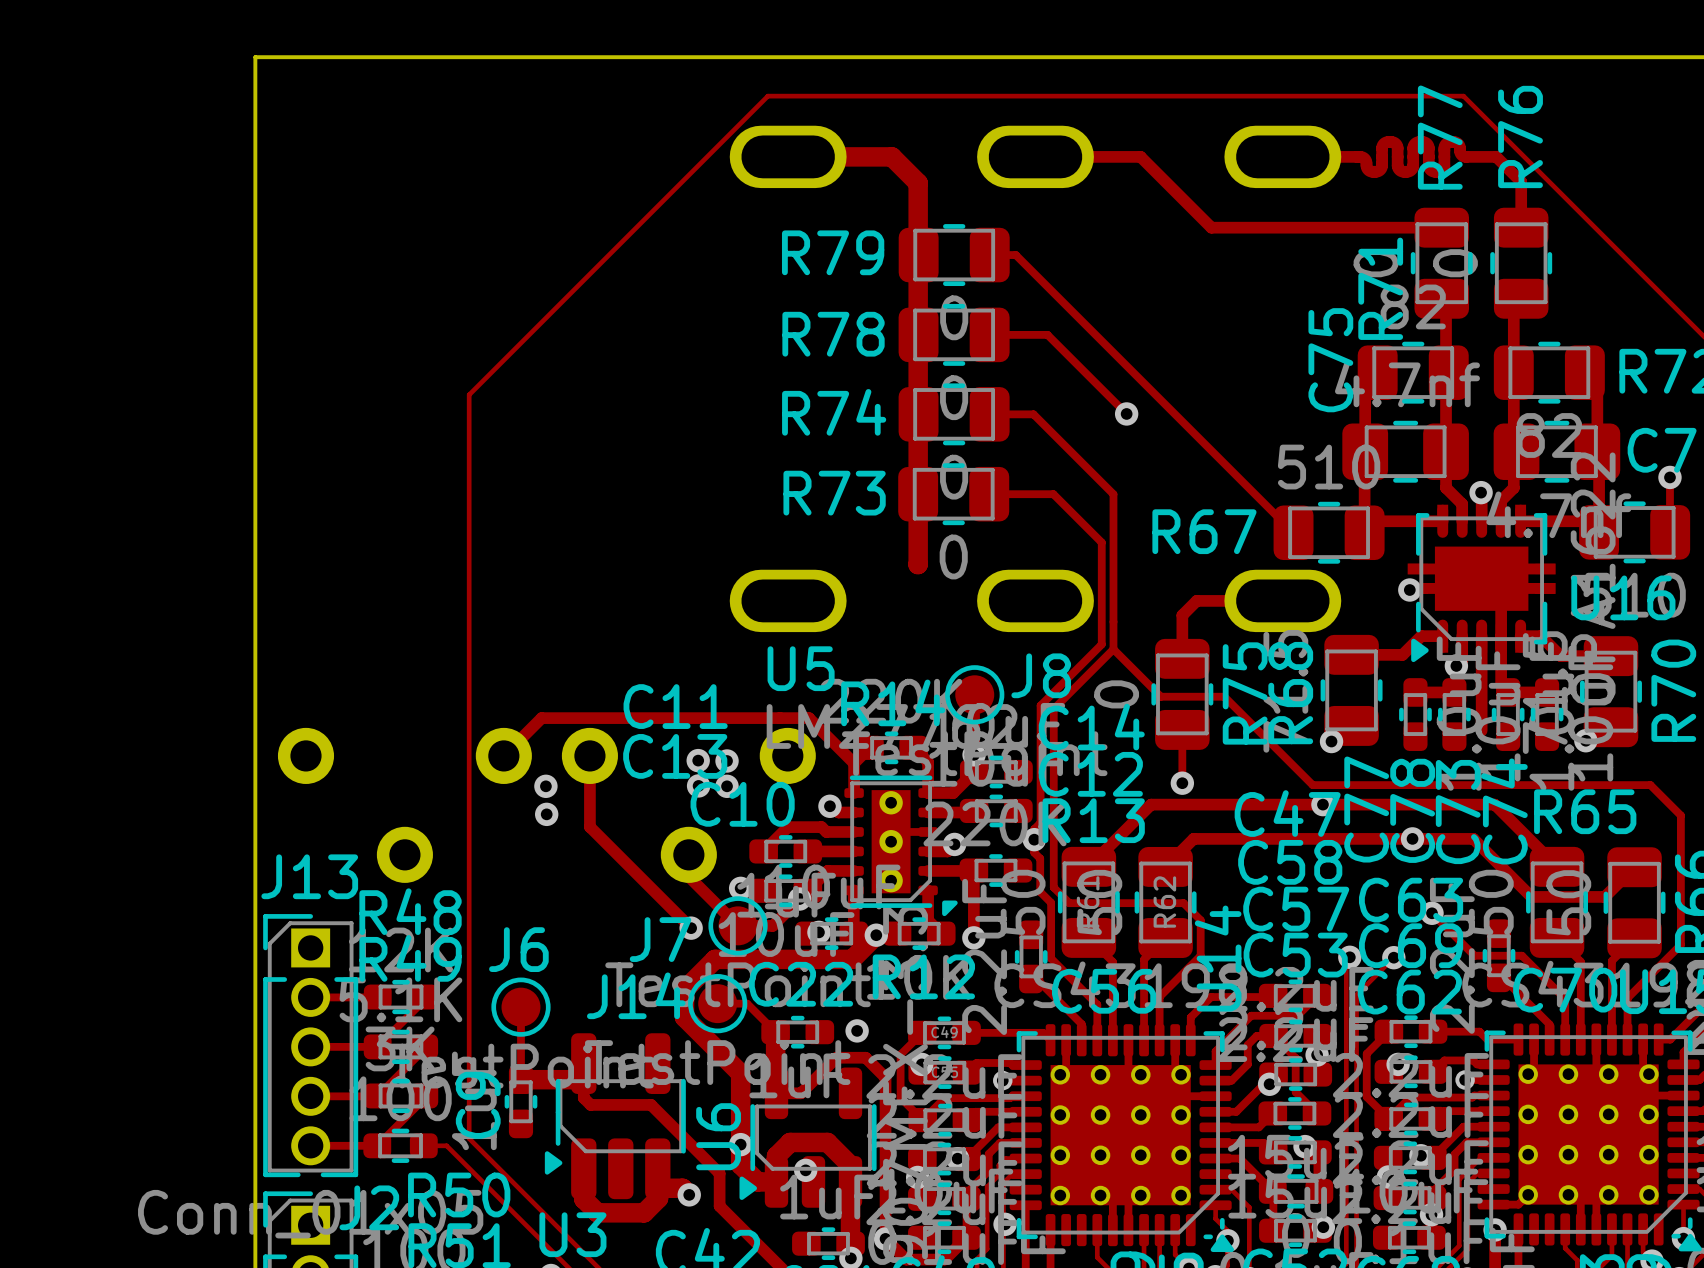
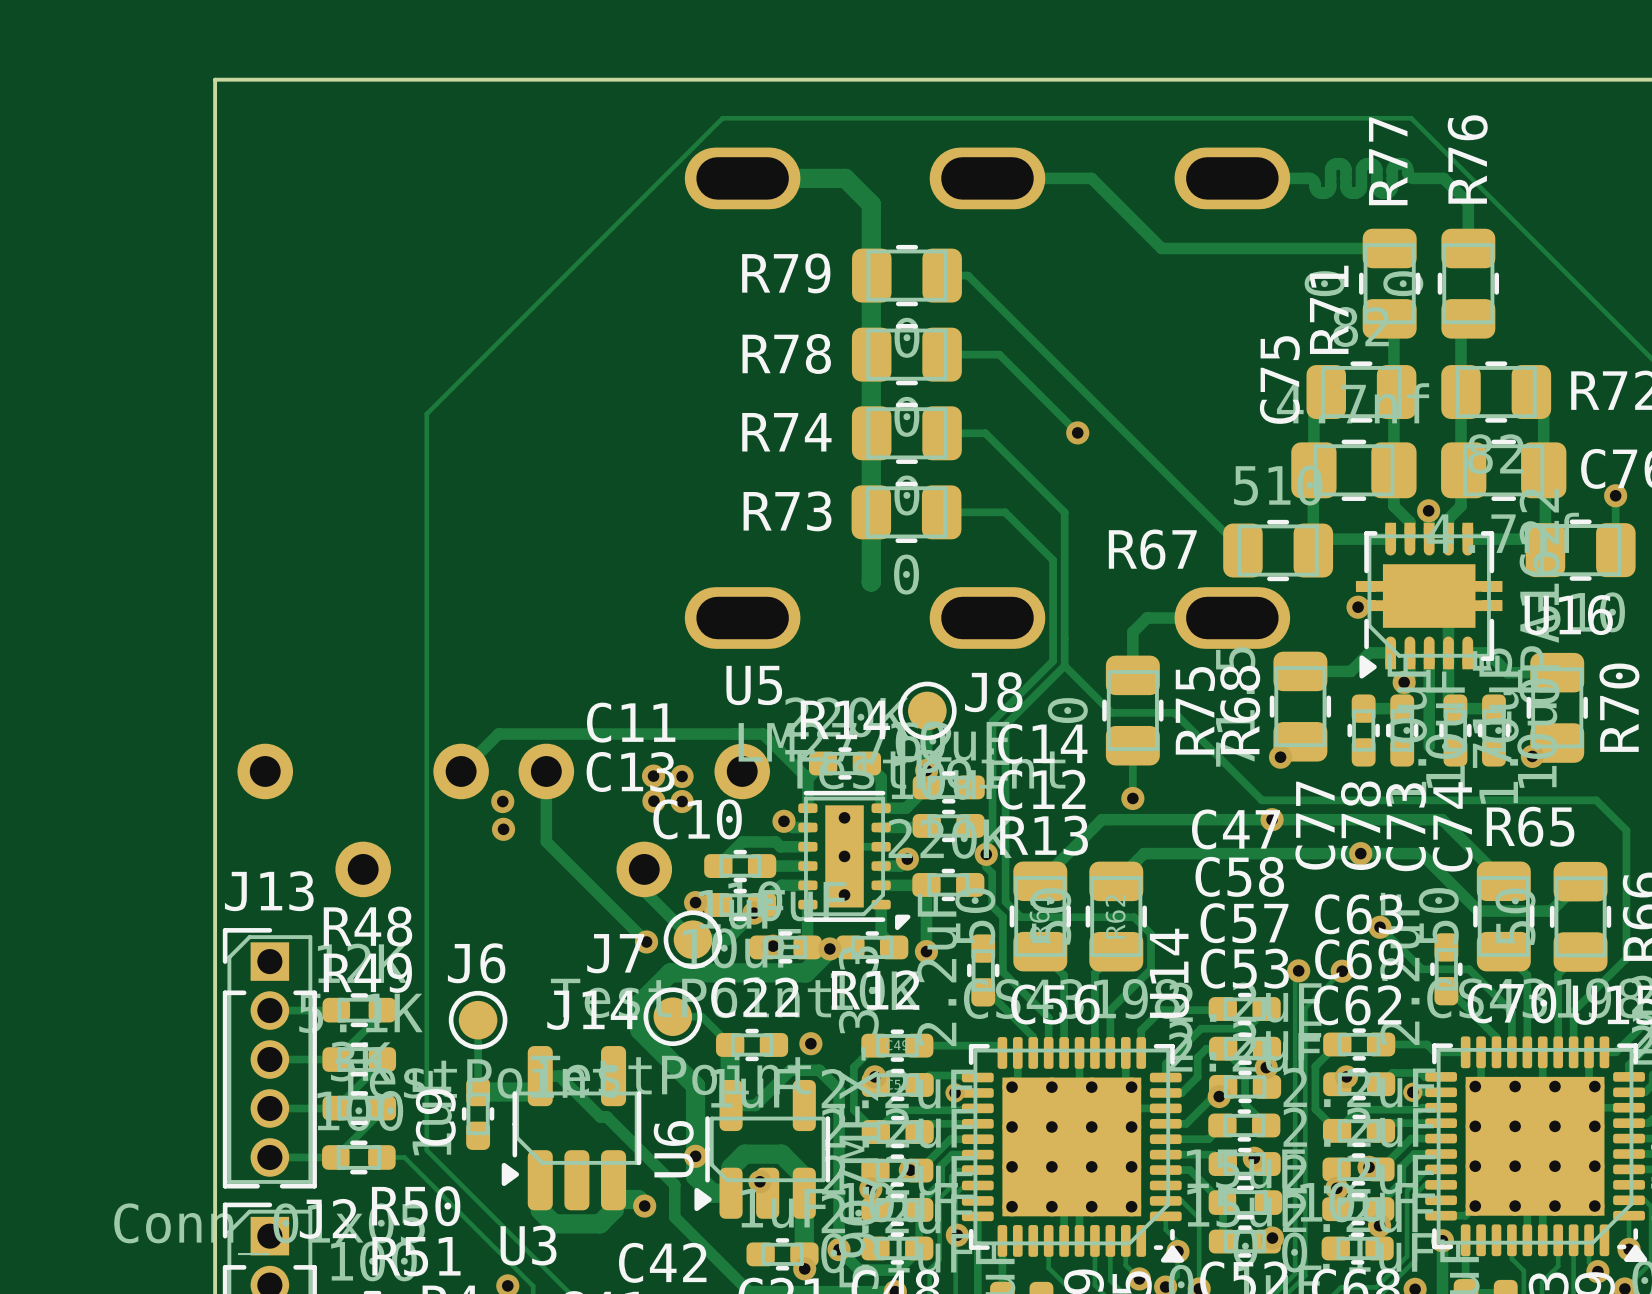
track: (583, 1063) (583, 1098) (590, 1104) (644, 1104) -> (540, 1076) (559, 1076) (600, 1116)

